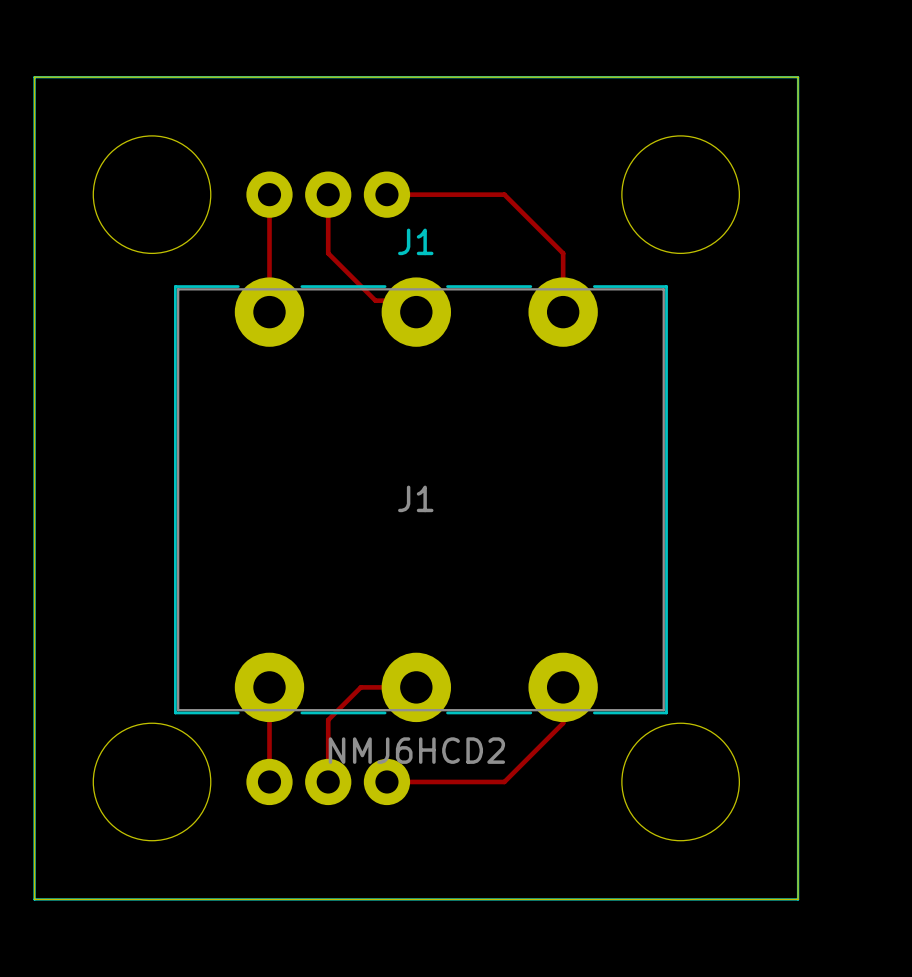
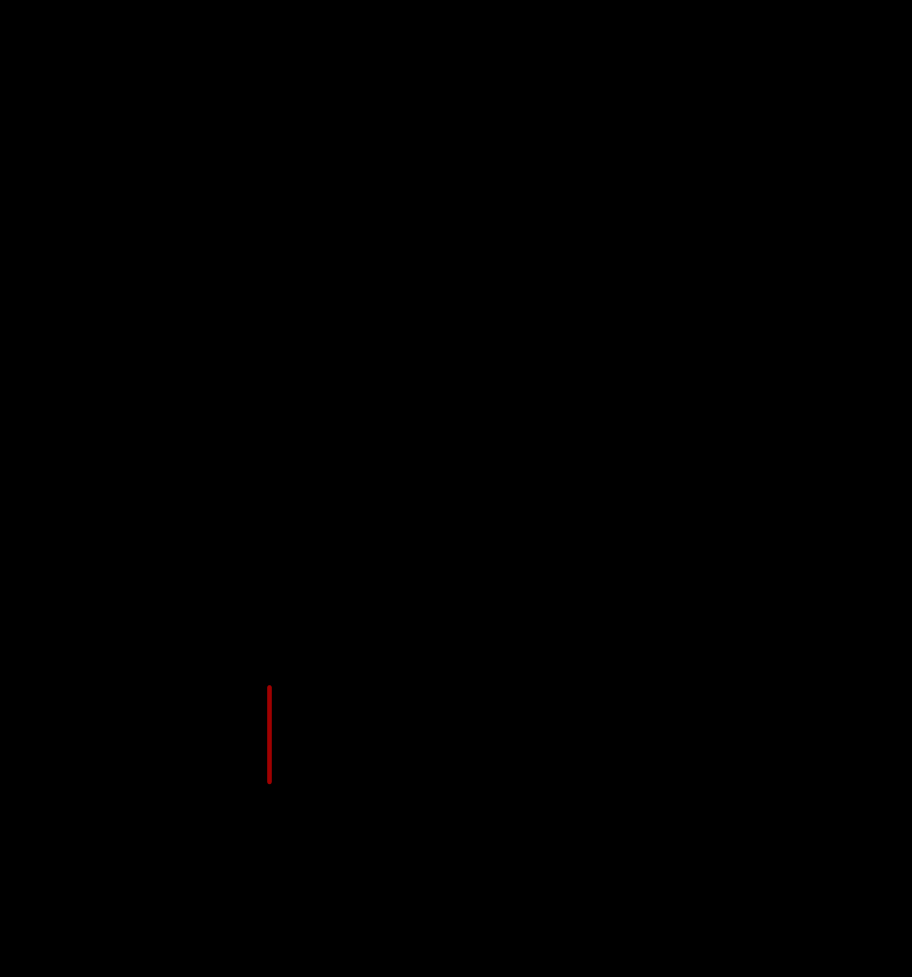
line: (34, 77) (798, 77) (798, 899) (34, 899) (34, 77) -> none
board edge: (34, 77) (798, 77) (798, 899) (34, 899) (34, 77) -> none
round board edge: [92, 135, 212, 254] -> none
round board edge: [621, 135, 740, 254] -> none
track: (269, 194) (269, 312) -> none
part: (269, 194) -> none
track: (328, 194) (328, 253) (375, 300) (416, 300) (416, 312) -> none
part: (328, 194) -> none
track: (386, 194) (504, 194) (563, 253) (563, 312) -> none
part: (386, 194) -> none
J1: NMJ6HCD2 (420, 499) -> none
track: (416, 687) (360, 687) (328, 720) (328, 781) -> none
track: (563, 687) (563, 723) (504, 781) (386, 781) -> none
round board edge: [92, 722, 212, 842] -> none
round board edge: [621, 722, 740, 842] -> none
part: (269, 781) -> none
part: (328, 781) -> none
part: (386, 781) -> none

